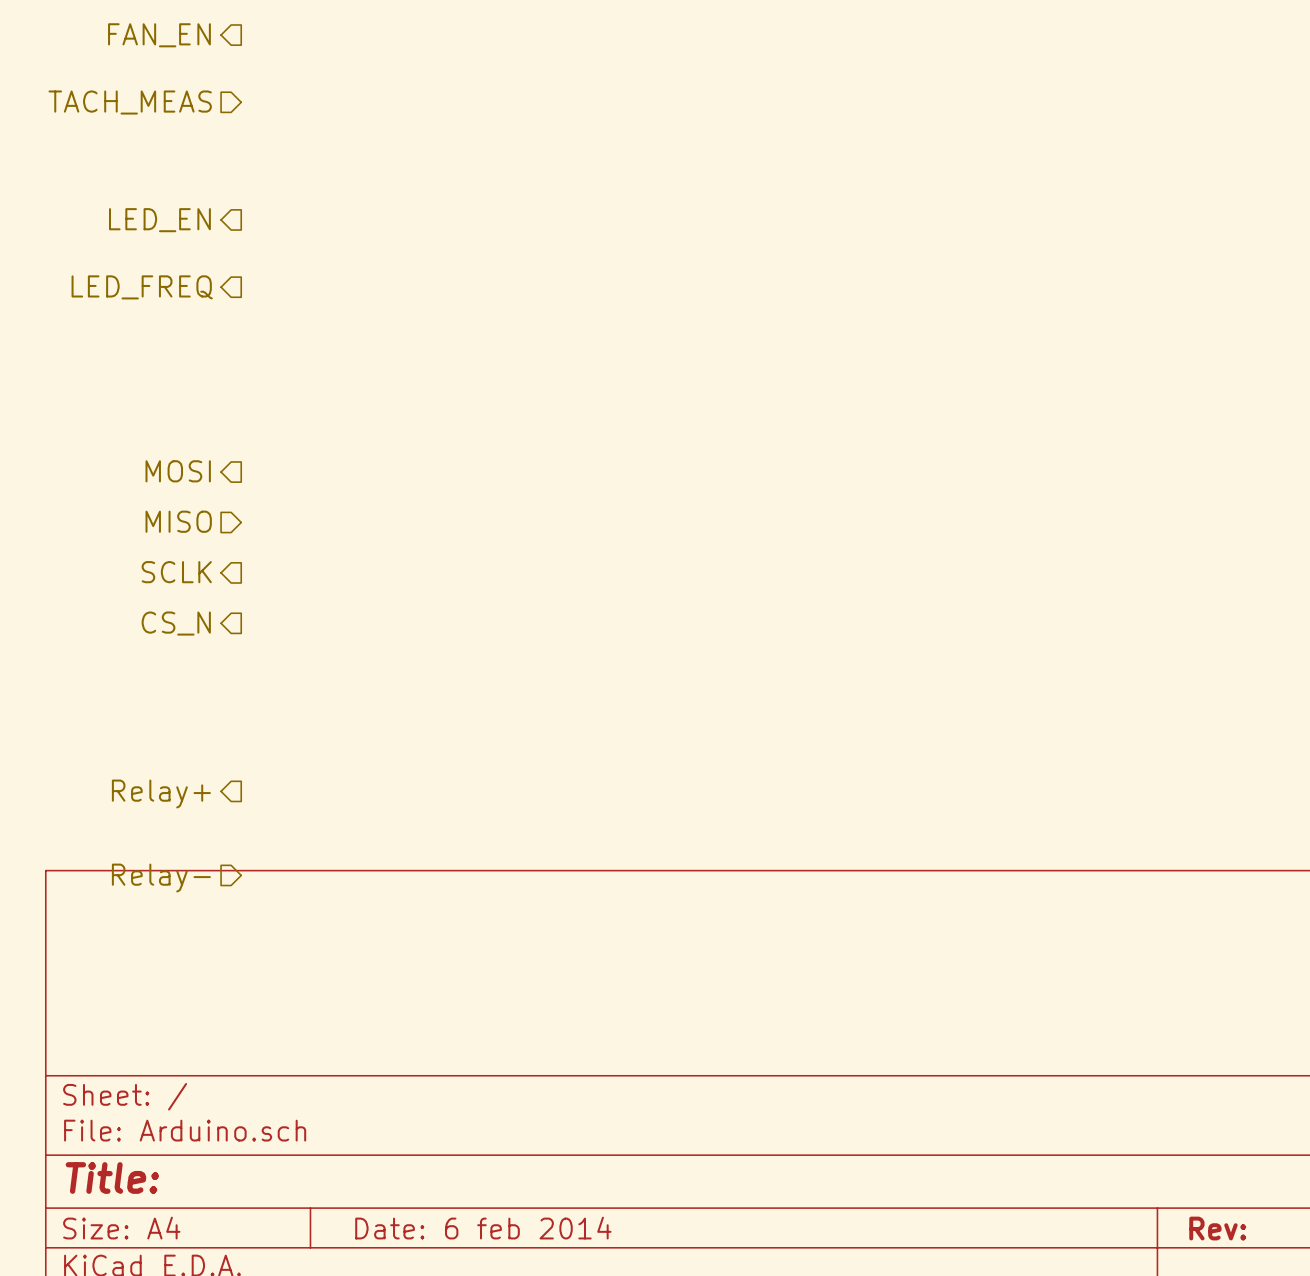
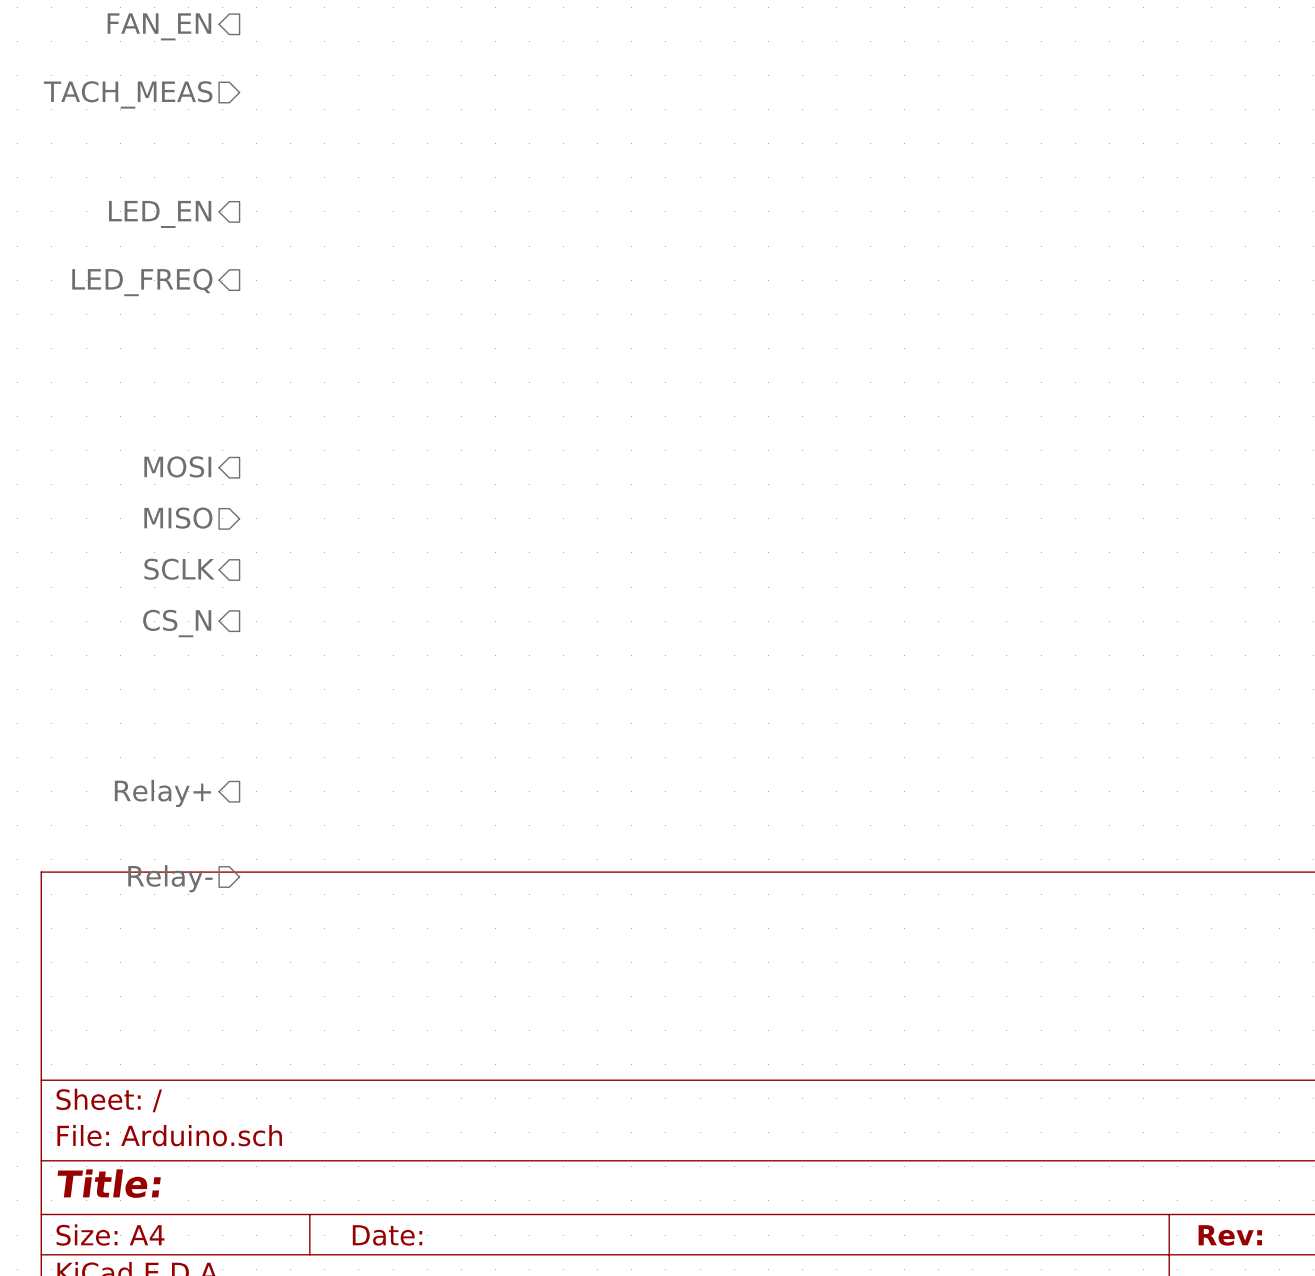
title block: Date: 6 feb 2014 (483, 1228) -> Date: (387, 1235)

